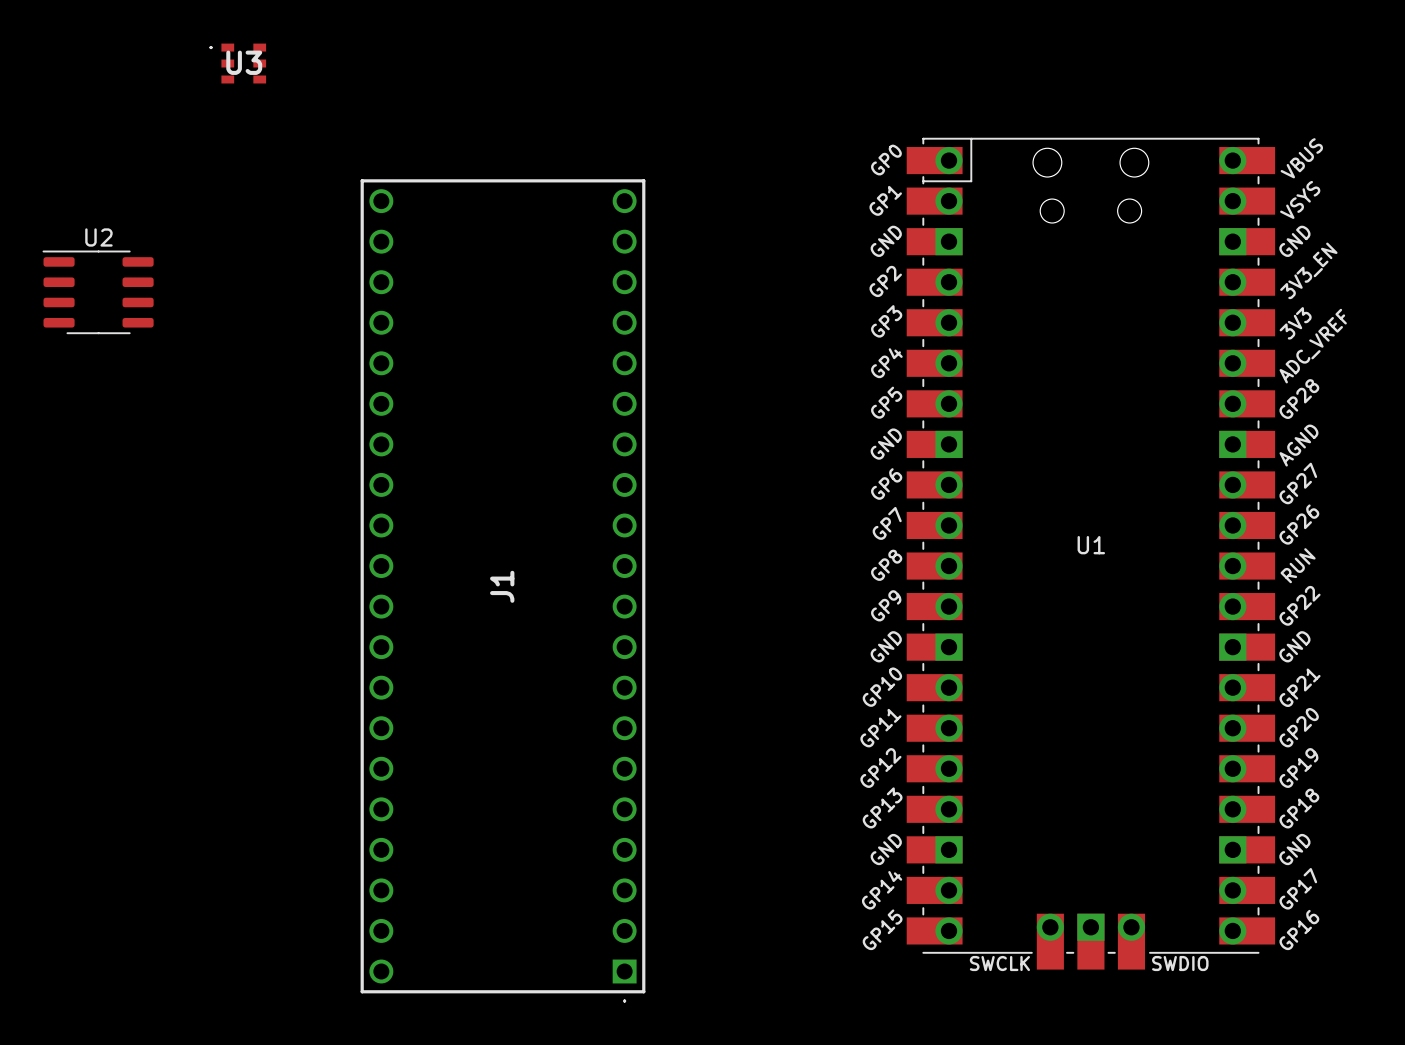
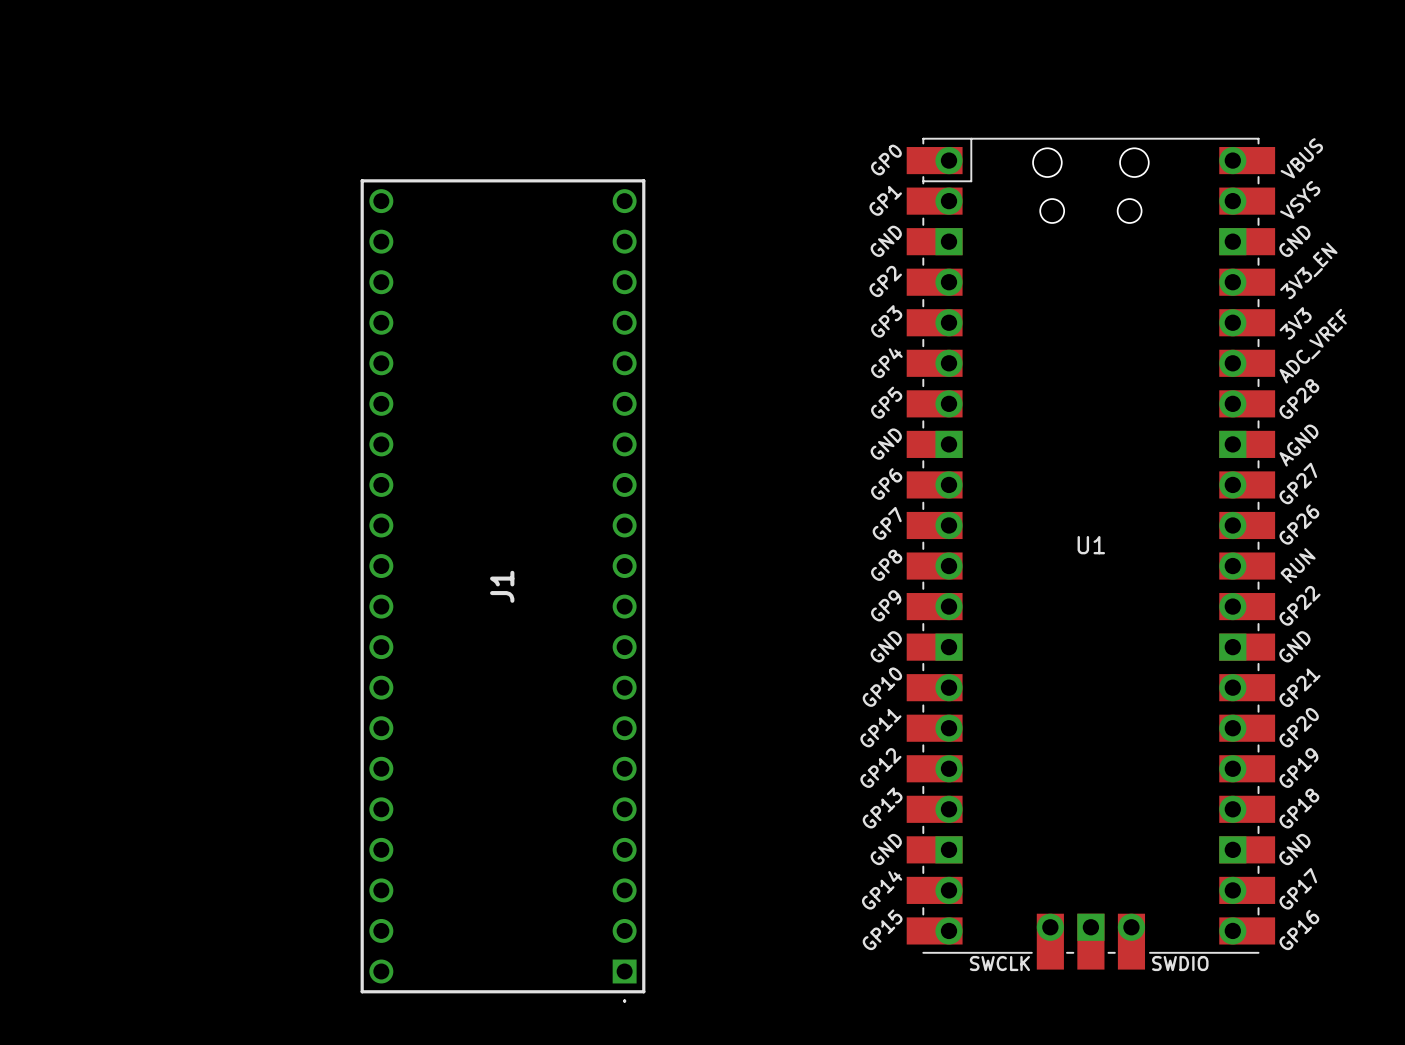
U3: (237, 63) -> none
U2: (98, 292) -> none

